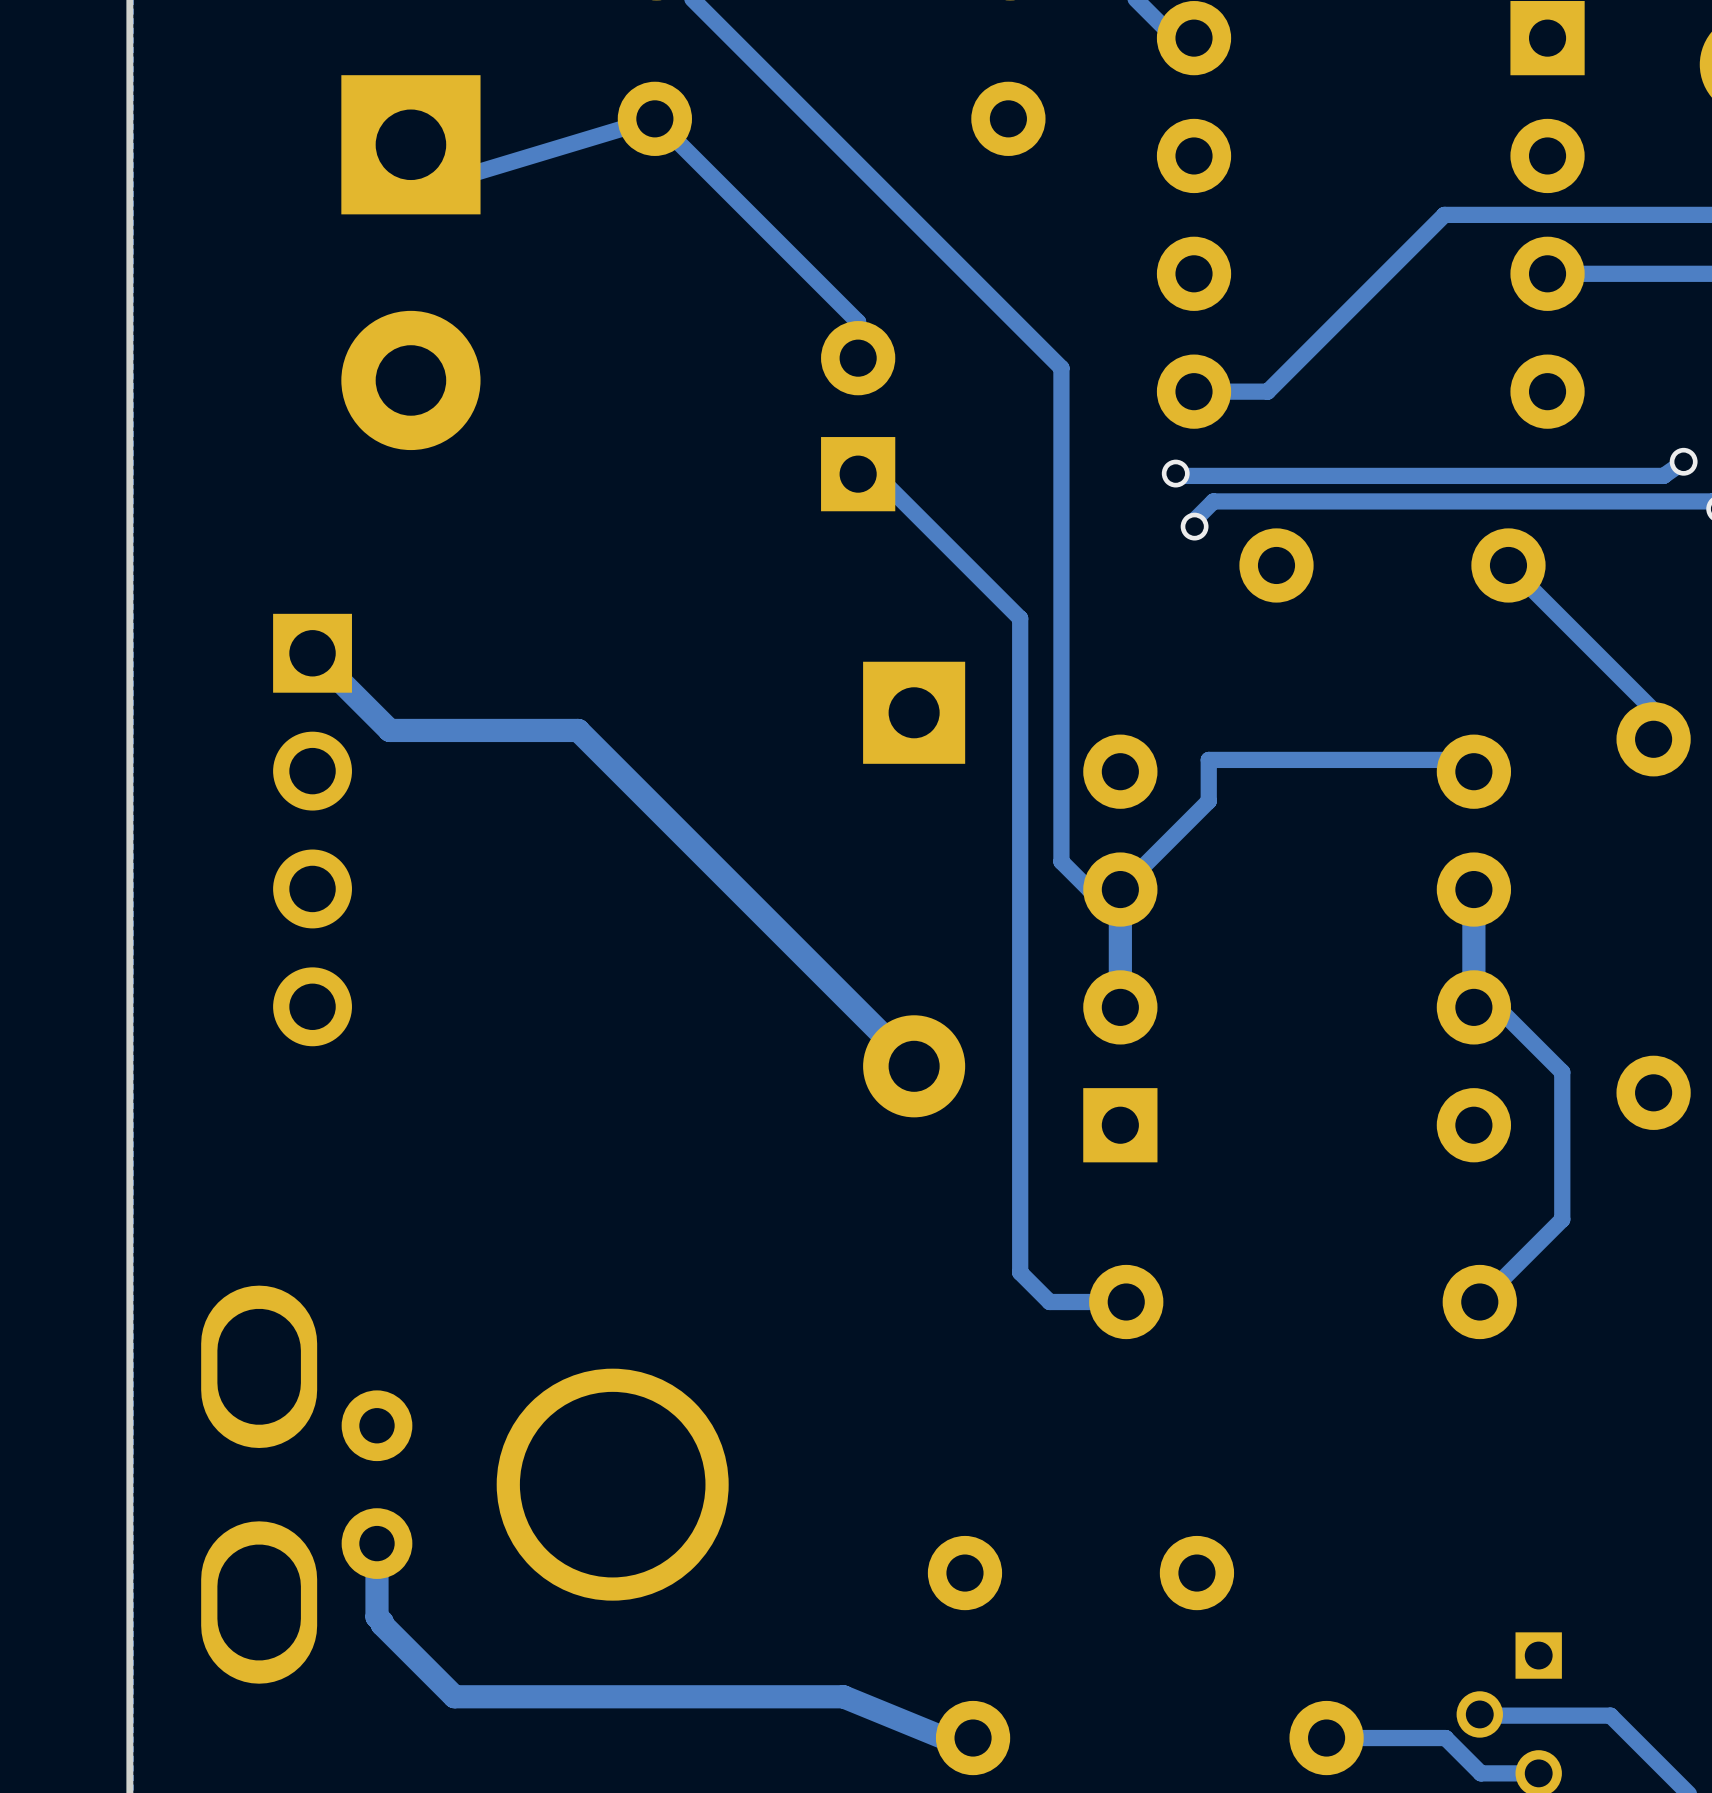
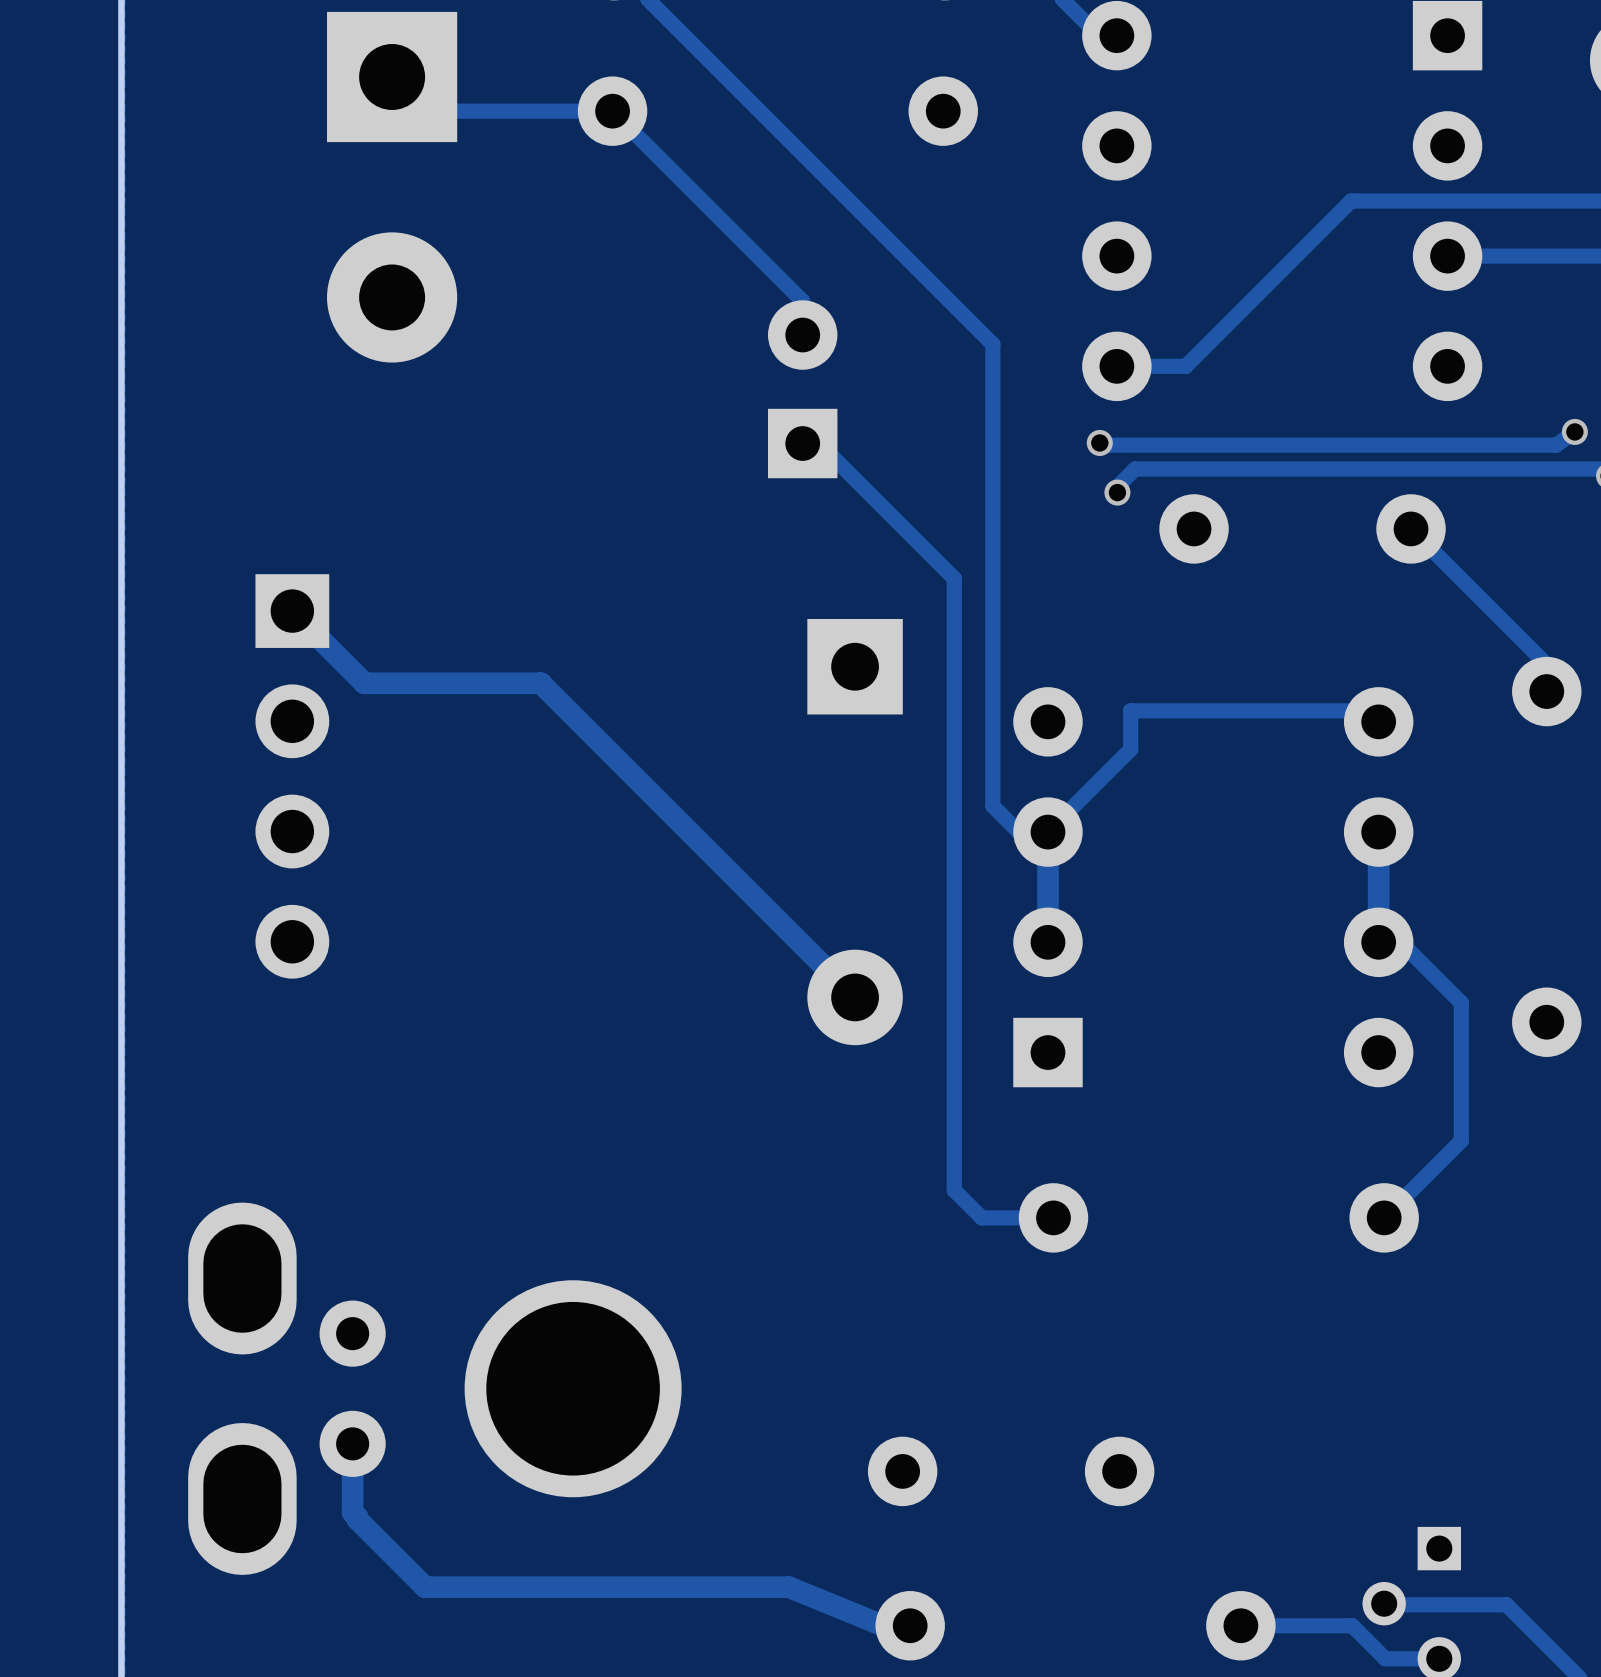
track: (654, 118) (447, 181) (410, 144) -> (612, 111) (426, 111) (392, 77)
part position: (410, 262) -> (392, 187)

